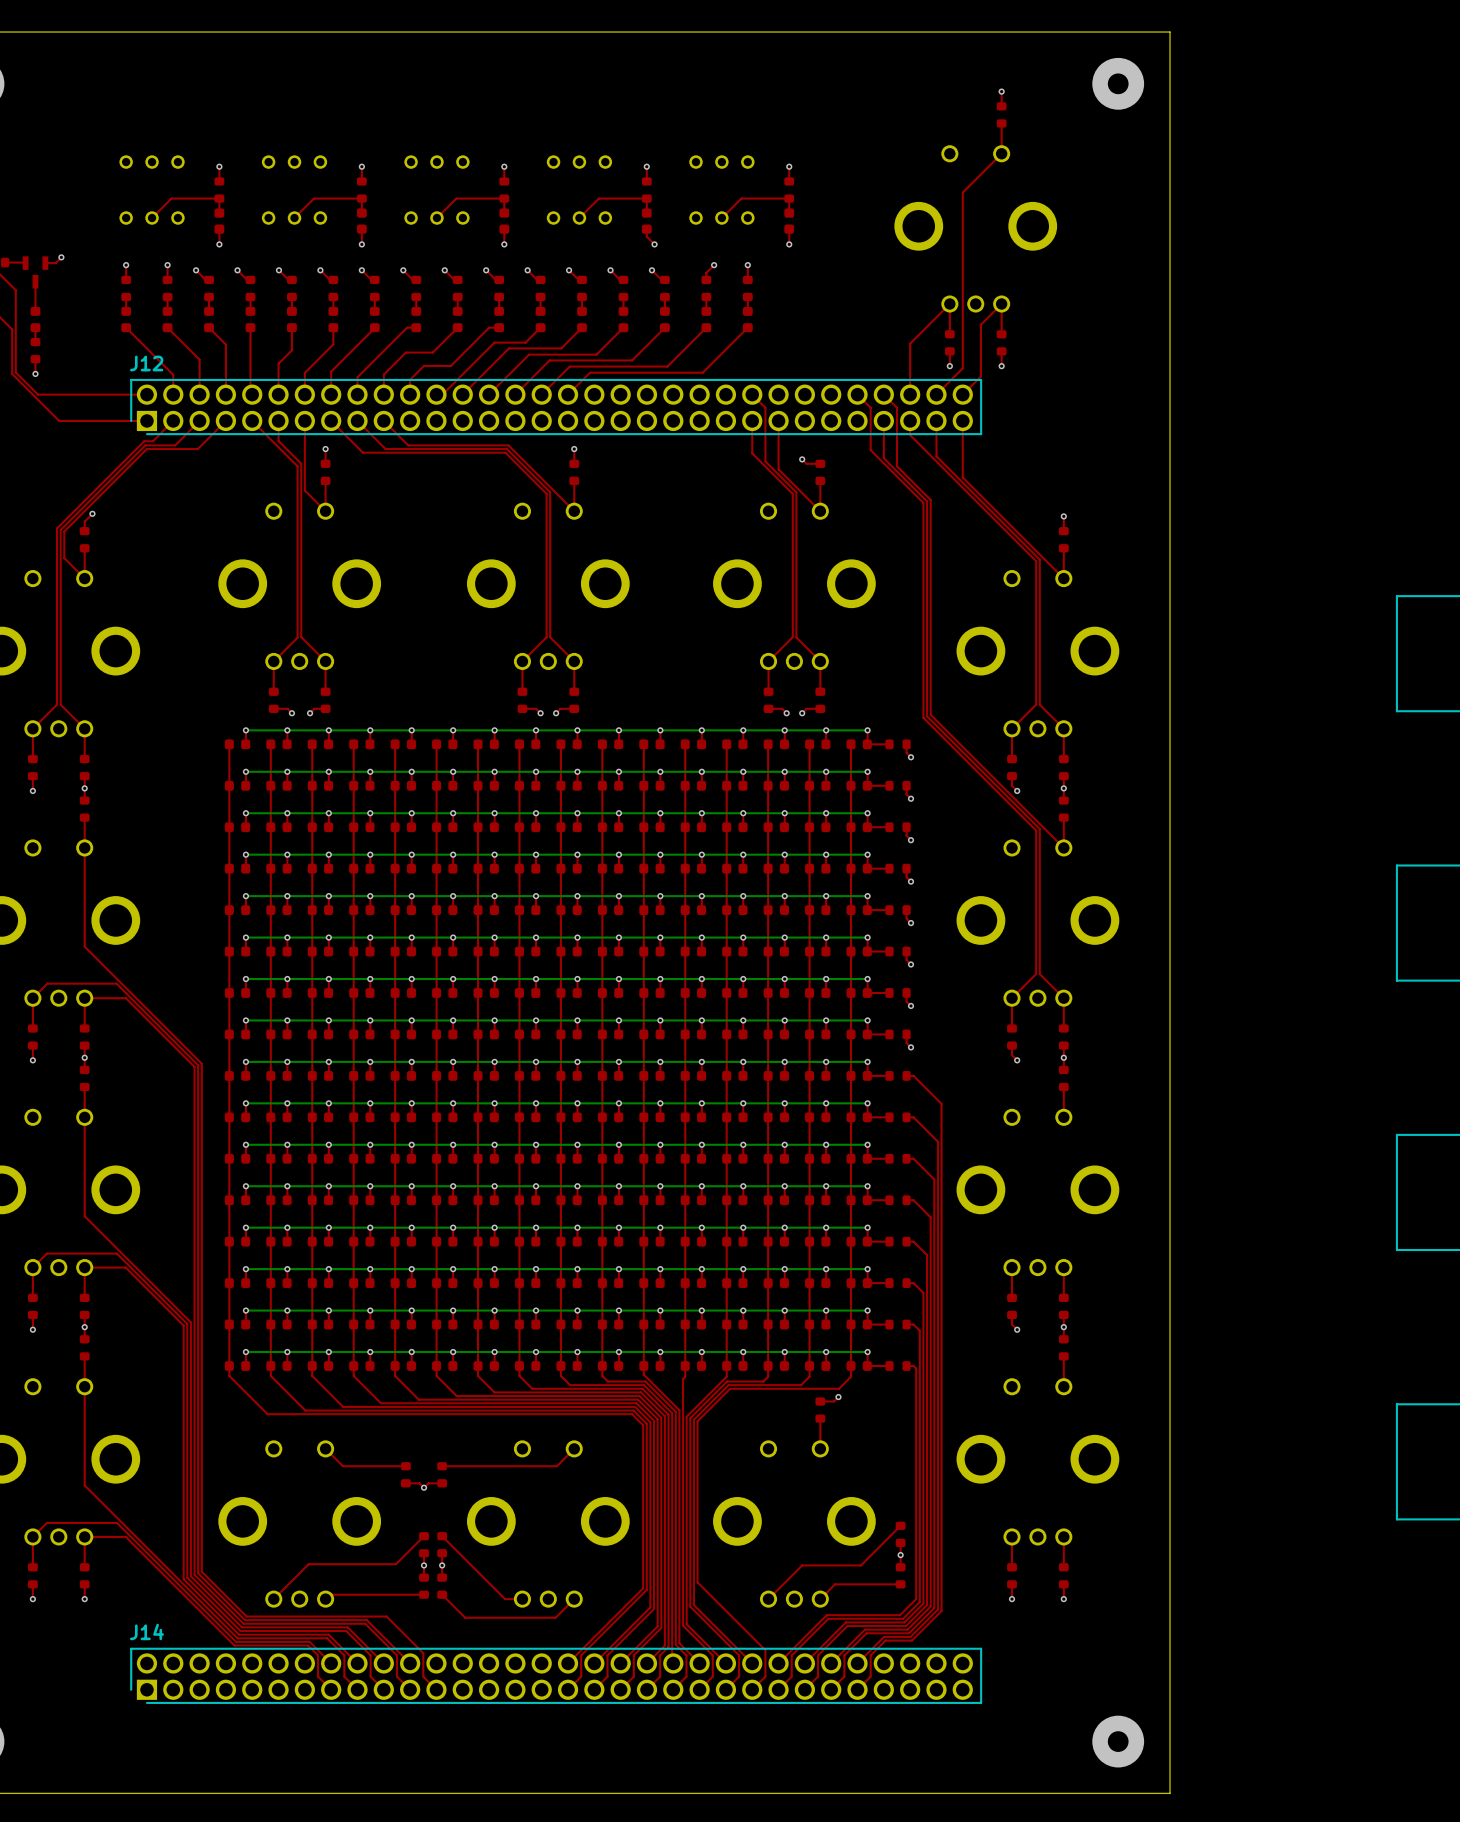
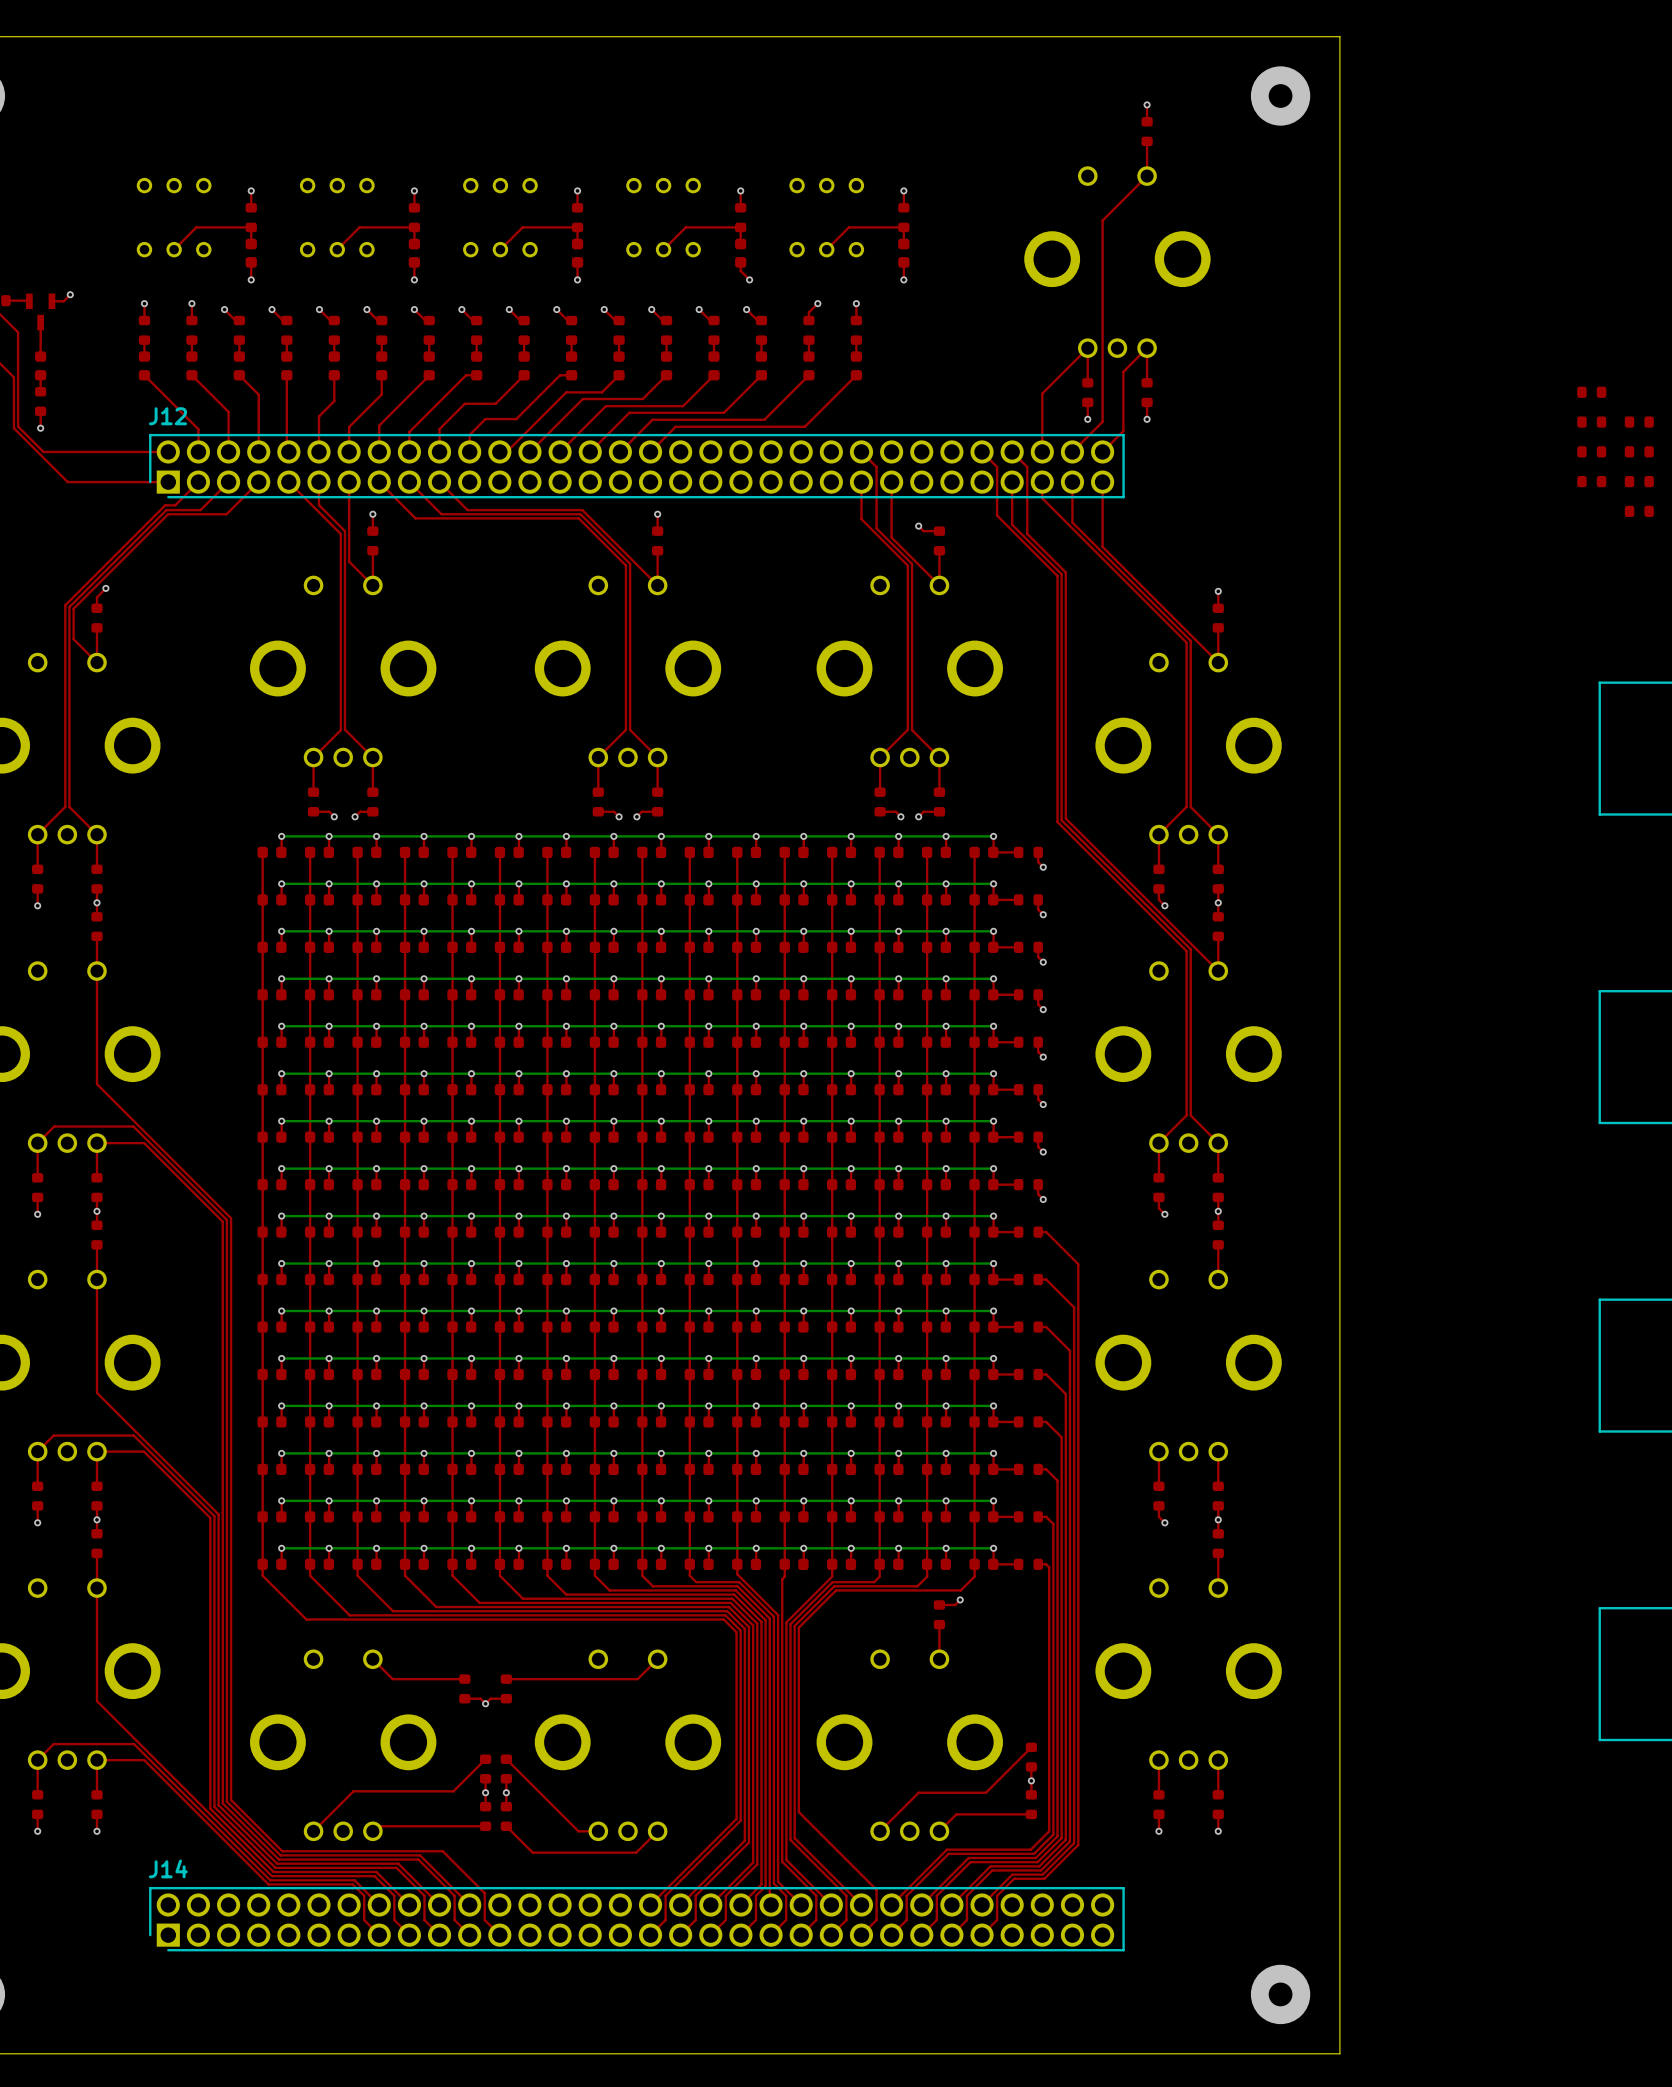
part: none -> (1591, 392)
part: none -> (1591, 422)
part: none -> (1639, 422)
part: none -> (1591, 451)
part: none -> (1639, 451)
part: none -> (1591, 481)
part: none -> (1639, 481)
part: none -> (1639, 511)

